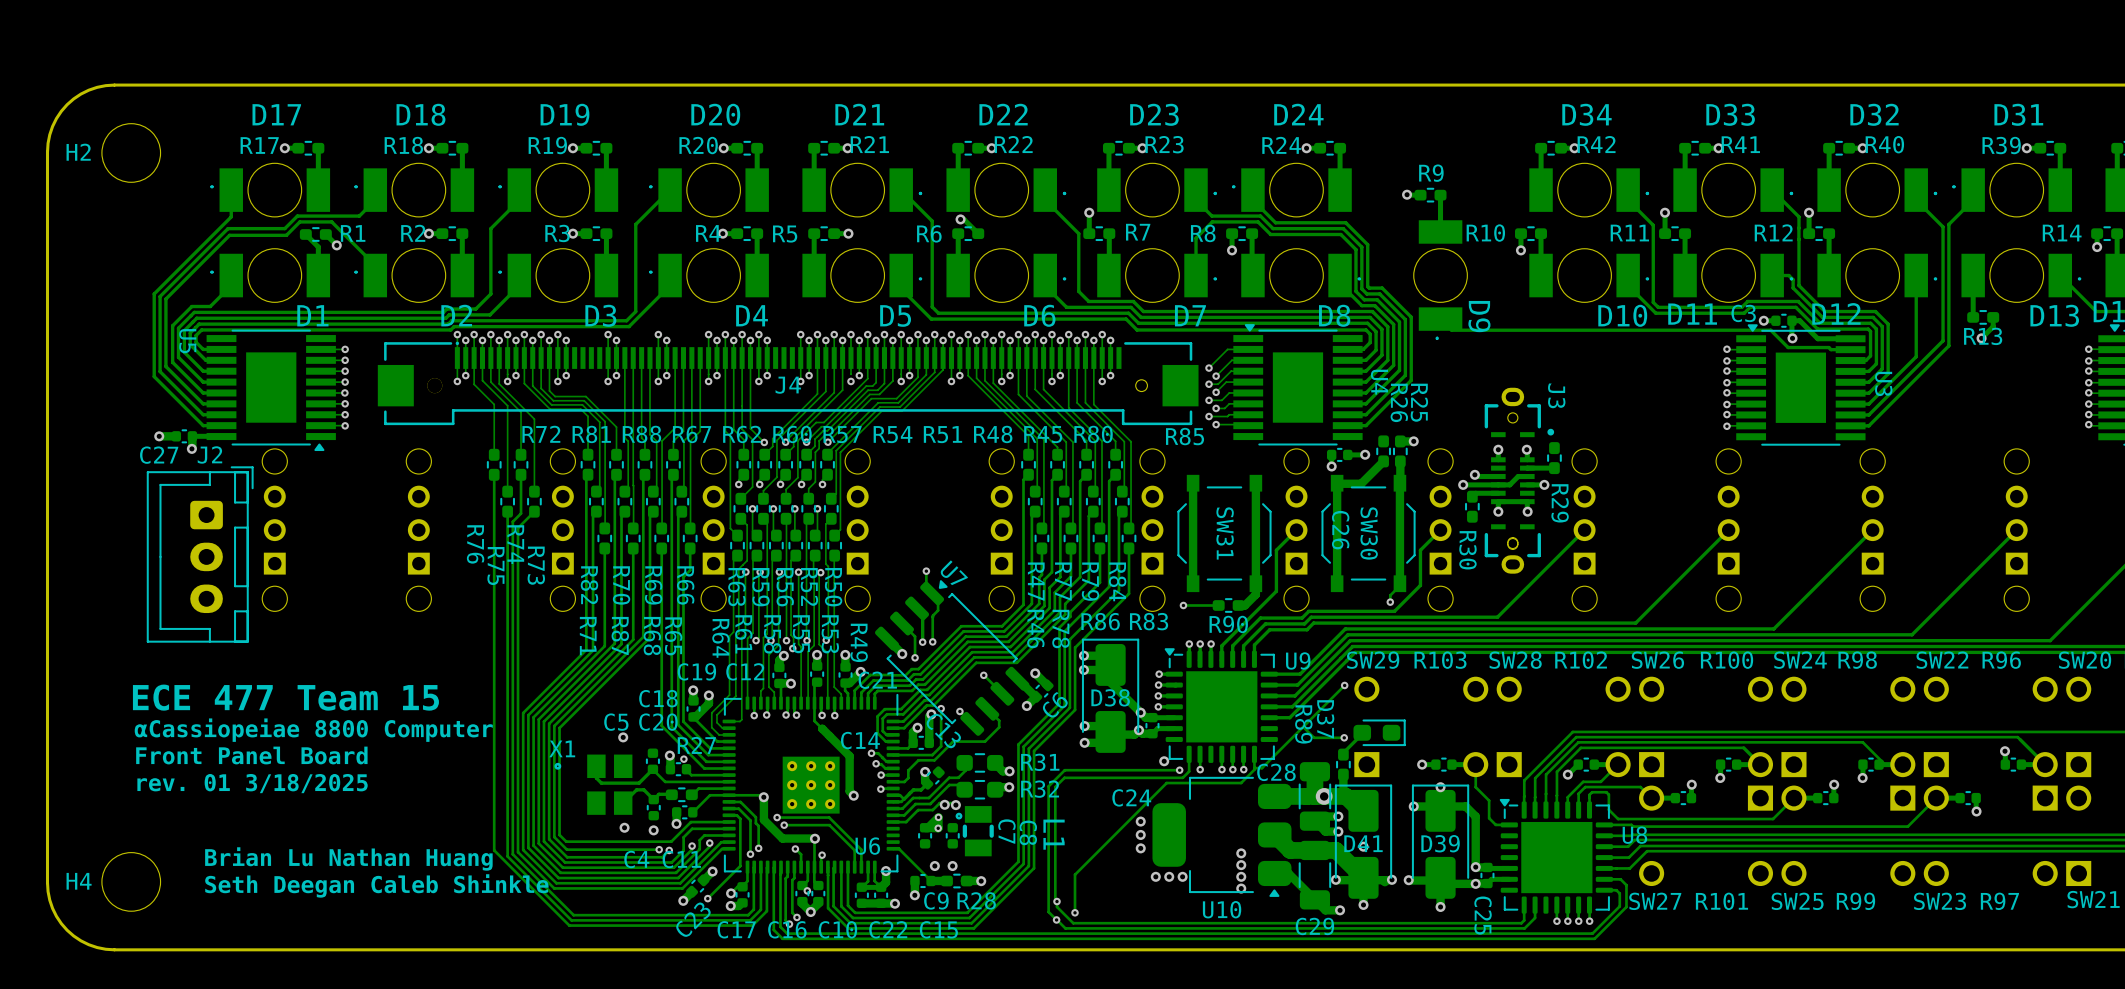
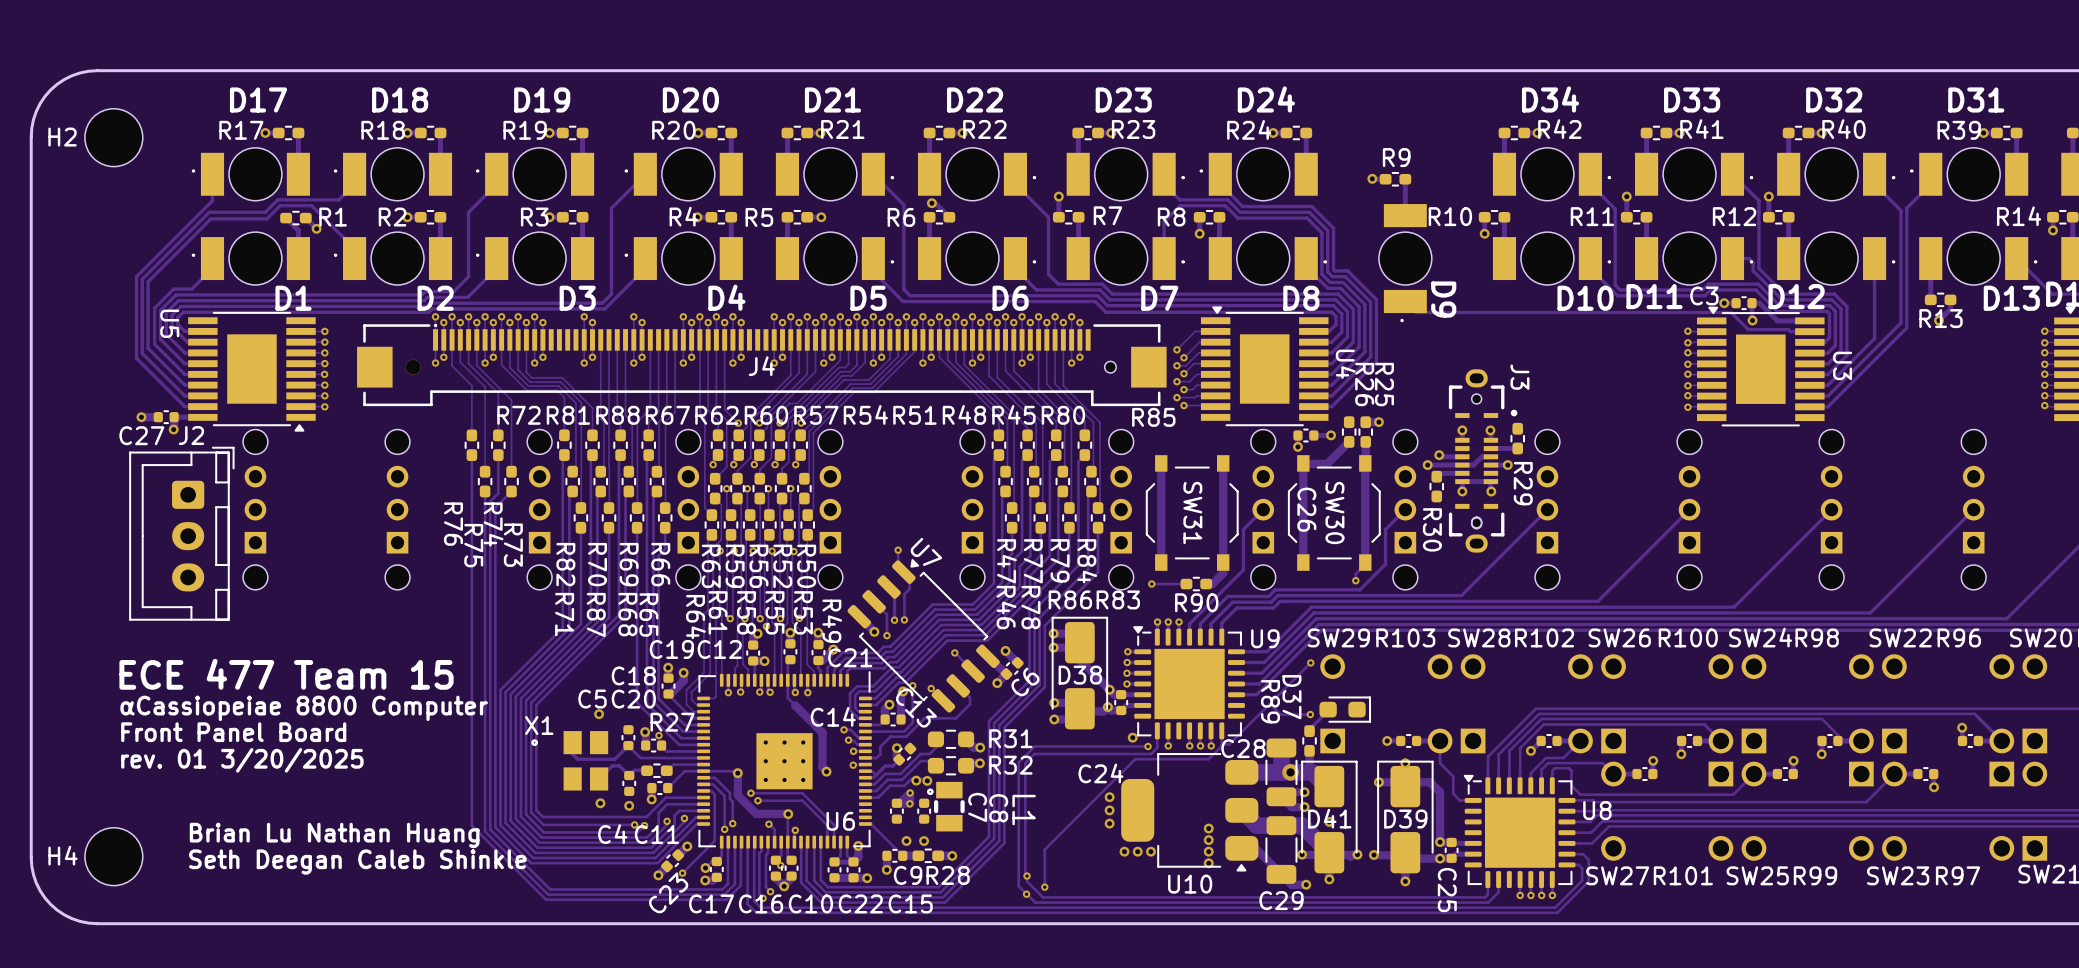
text: rev. 01 3/18/2025 (252, 783) -> rev. 01 3/20/2025 (242, 760)

